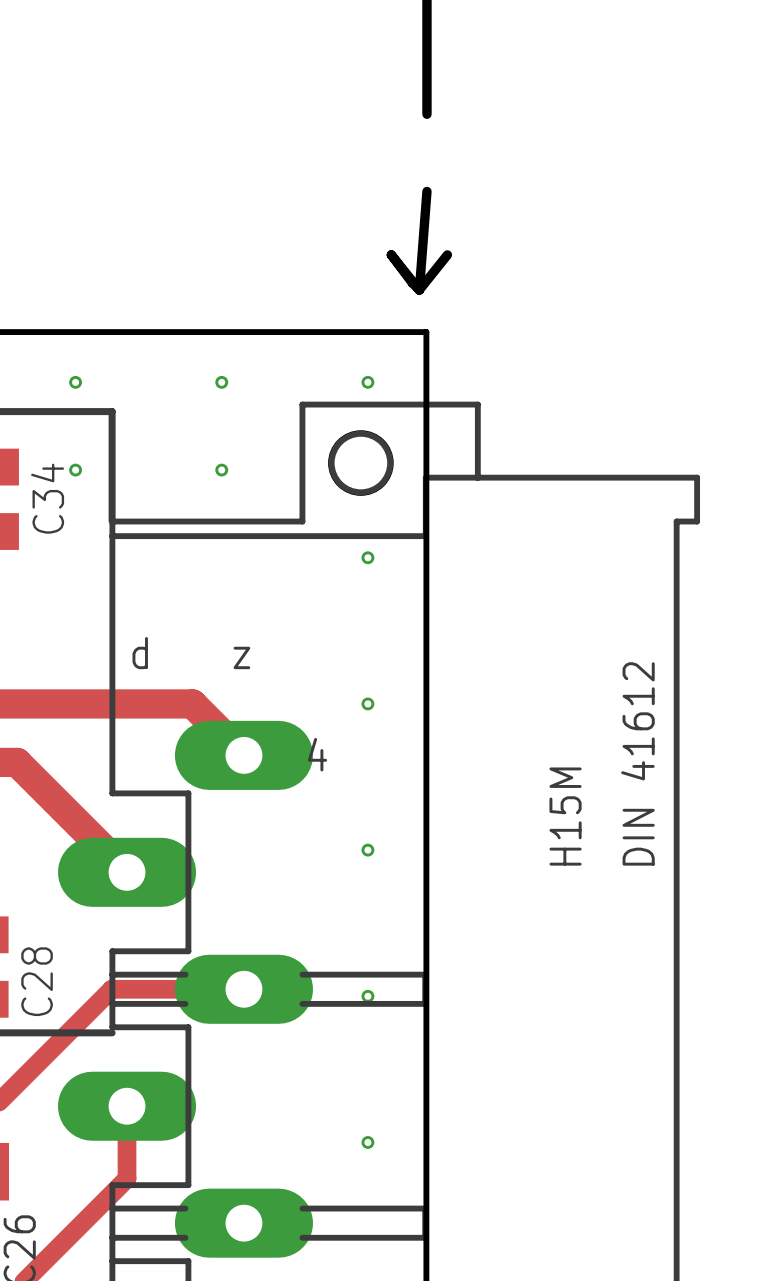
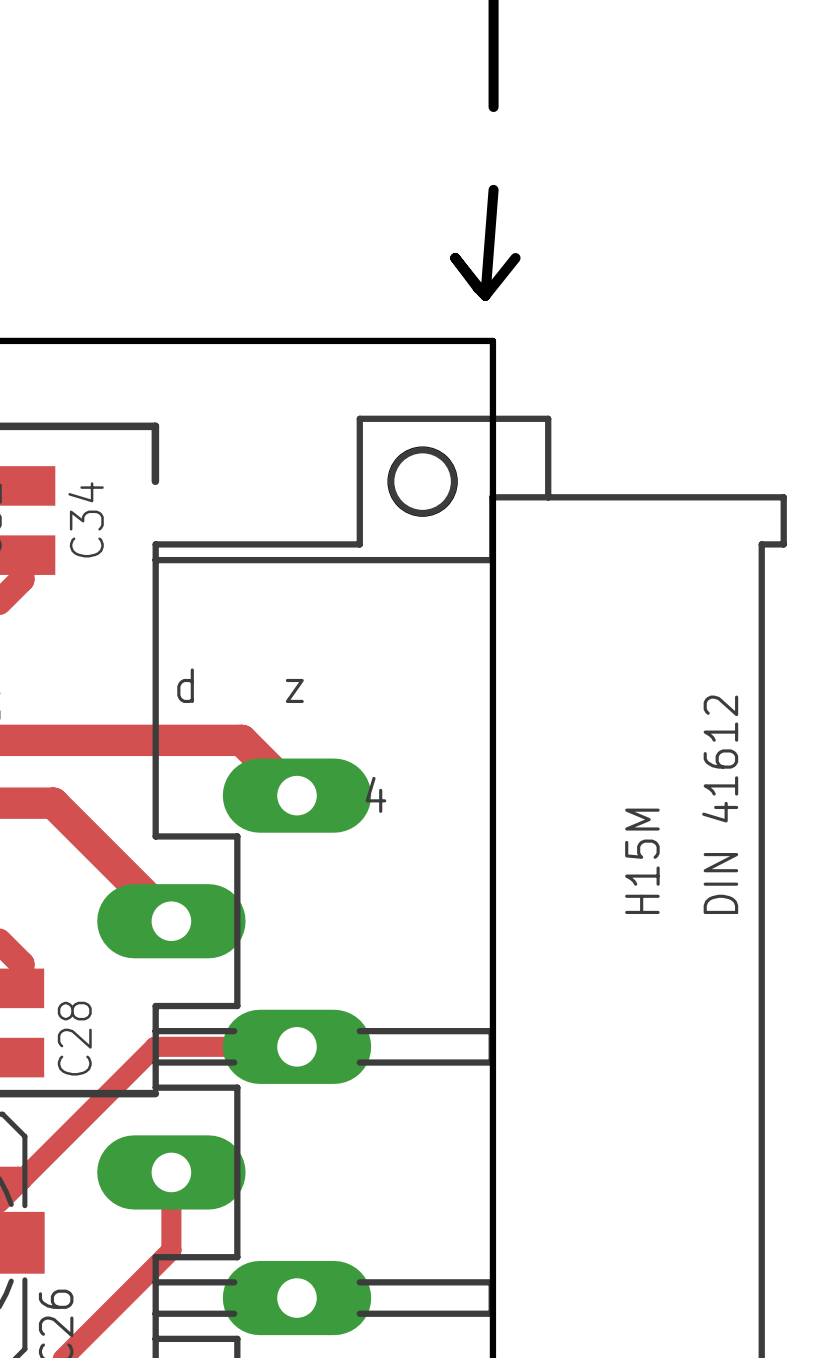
via: (75, 382) -> none
via: (221, 382) -> none
via: (367, 382) -> none
line: (112, 462) (112, 521) -> none
via: (75, 470) -> none
via: (221, 470) -> none
via: (367, 557) -> none
via: (367, 703) -> none
via: (367, 850) -> none
via: (367, 996) -> none
via: (367, 1142) -> none

